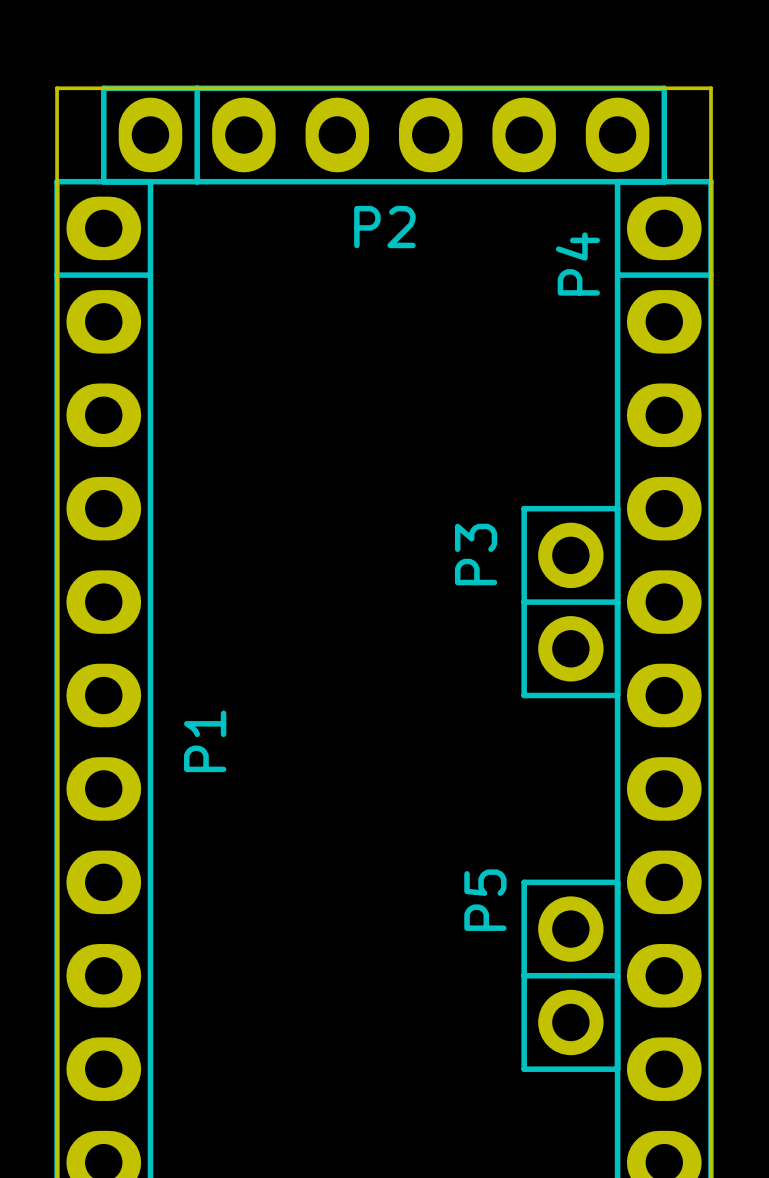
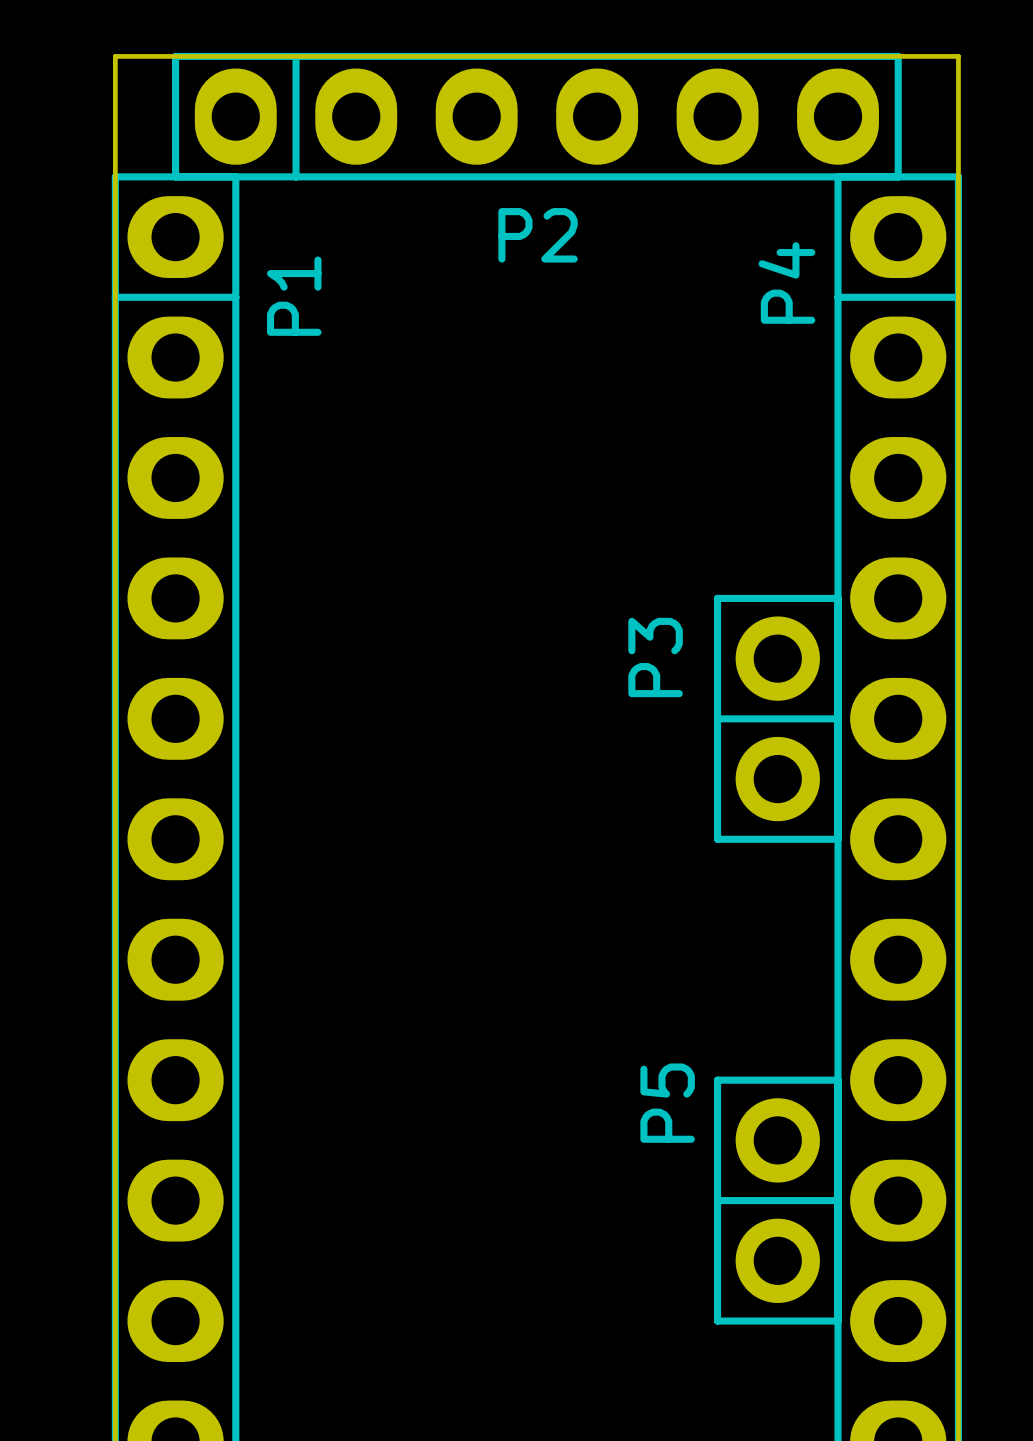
P1 name position: P1 (205, 741) -> P1 (294, 296)

